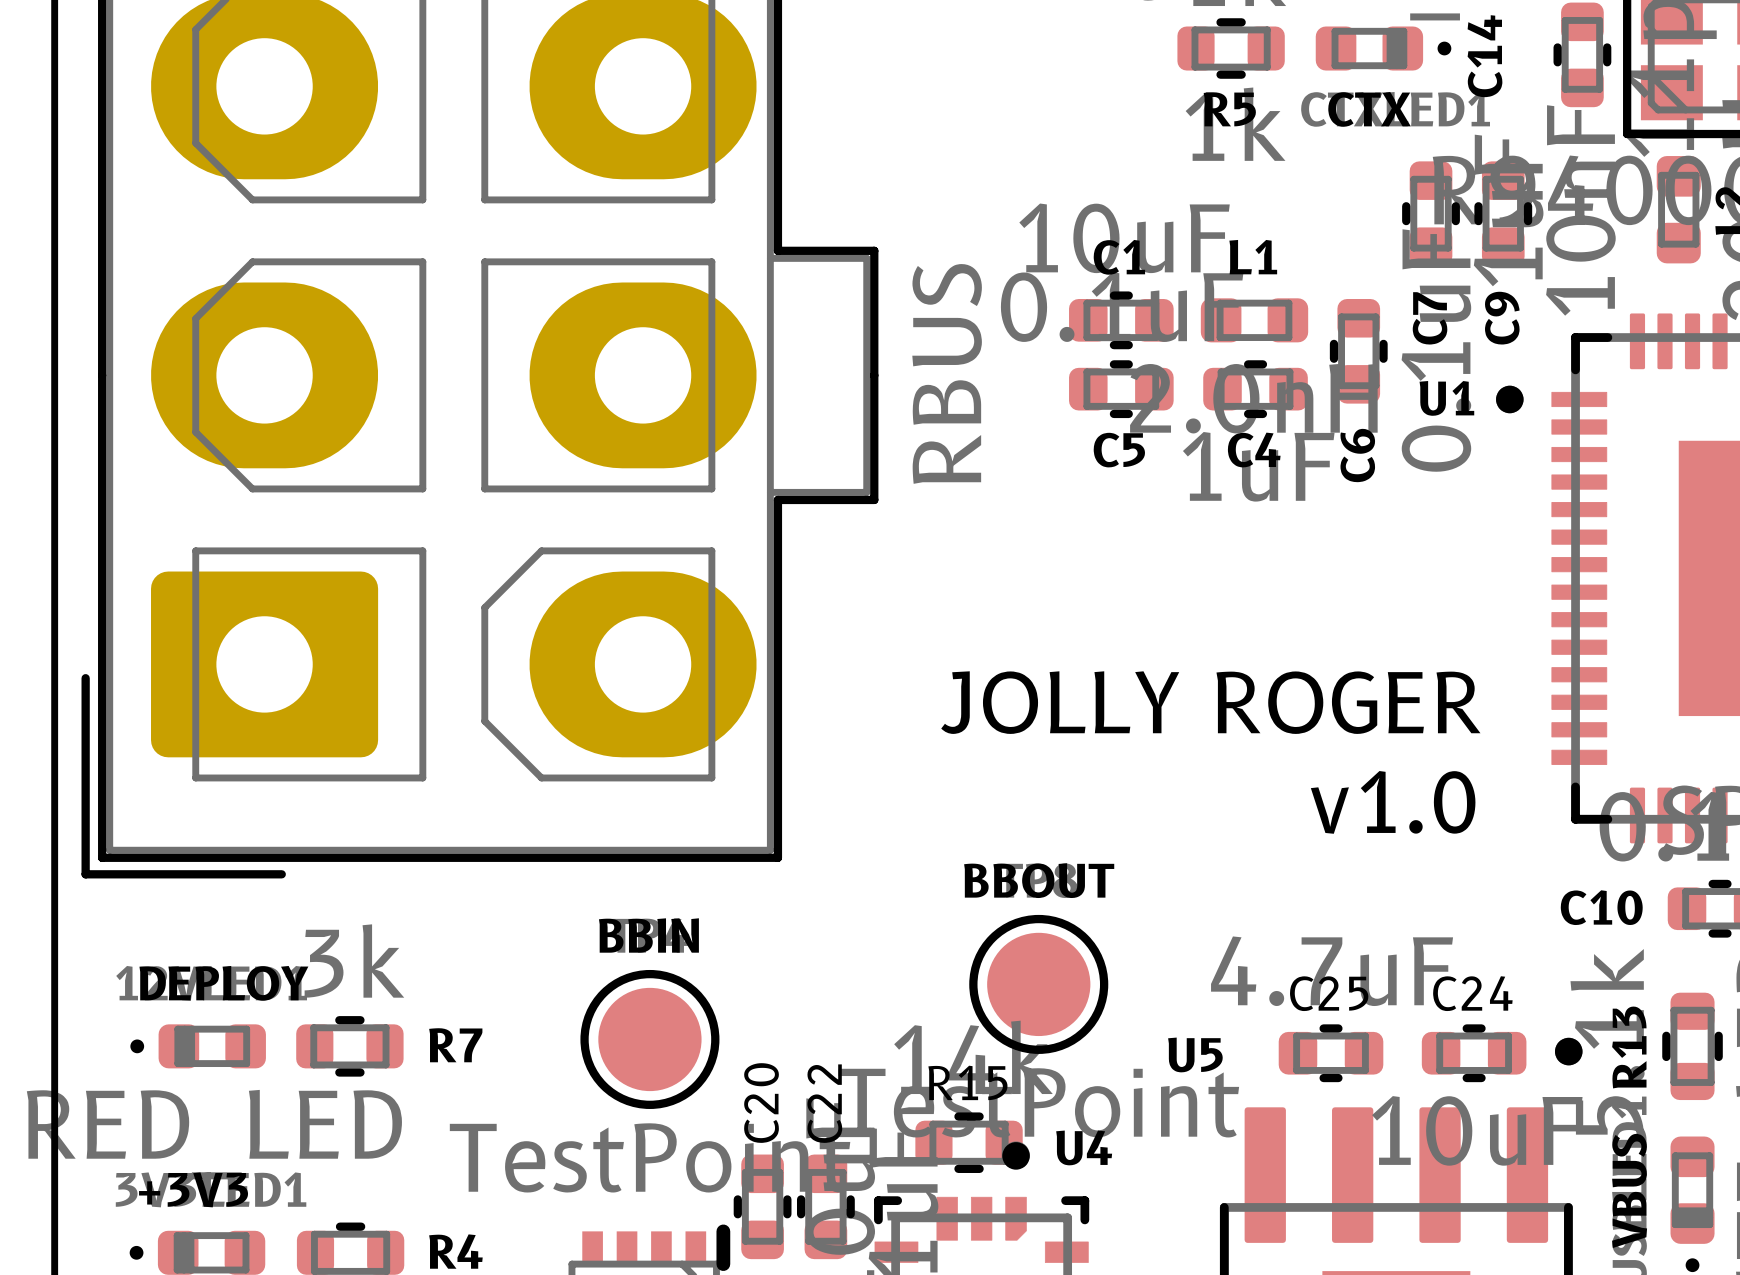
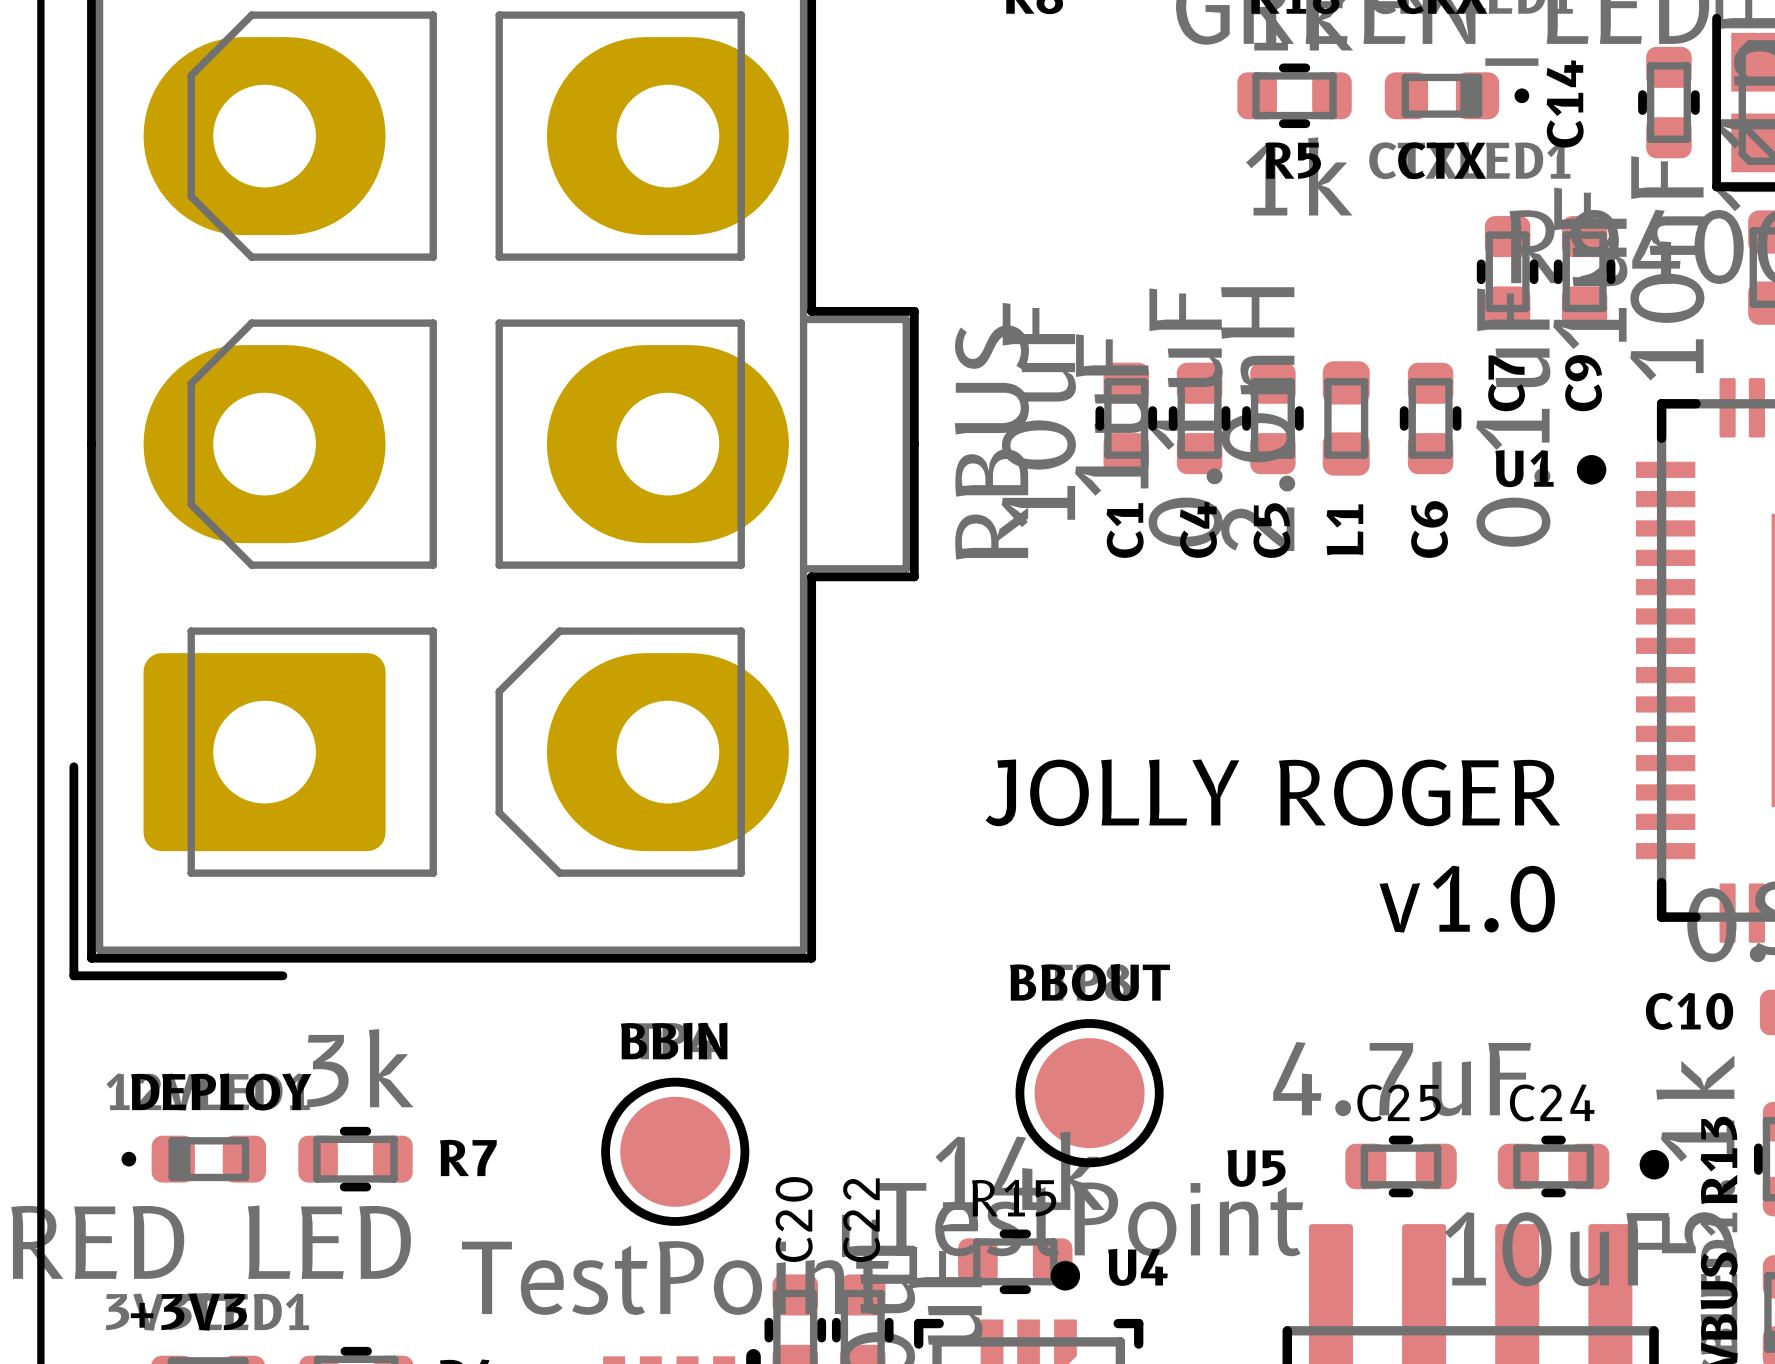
C1 rotation: 0° (1121, 320) -> 90° clockwise (1126, 418)
L1 rotation: 0° (1254, 320) -> 90° clockwise (1346, 418)
C5 rotation: 0° (1121, 389) -> 90° clockwise (1272, 418)
C5 position: (1121, 389) -> (1272, 418)
C4 rotation: 0° (1255, 389) -> 90° clockwise (1199, 418)
C4 position: (1255, 389) -> (1199, 418)

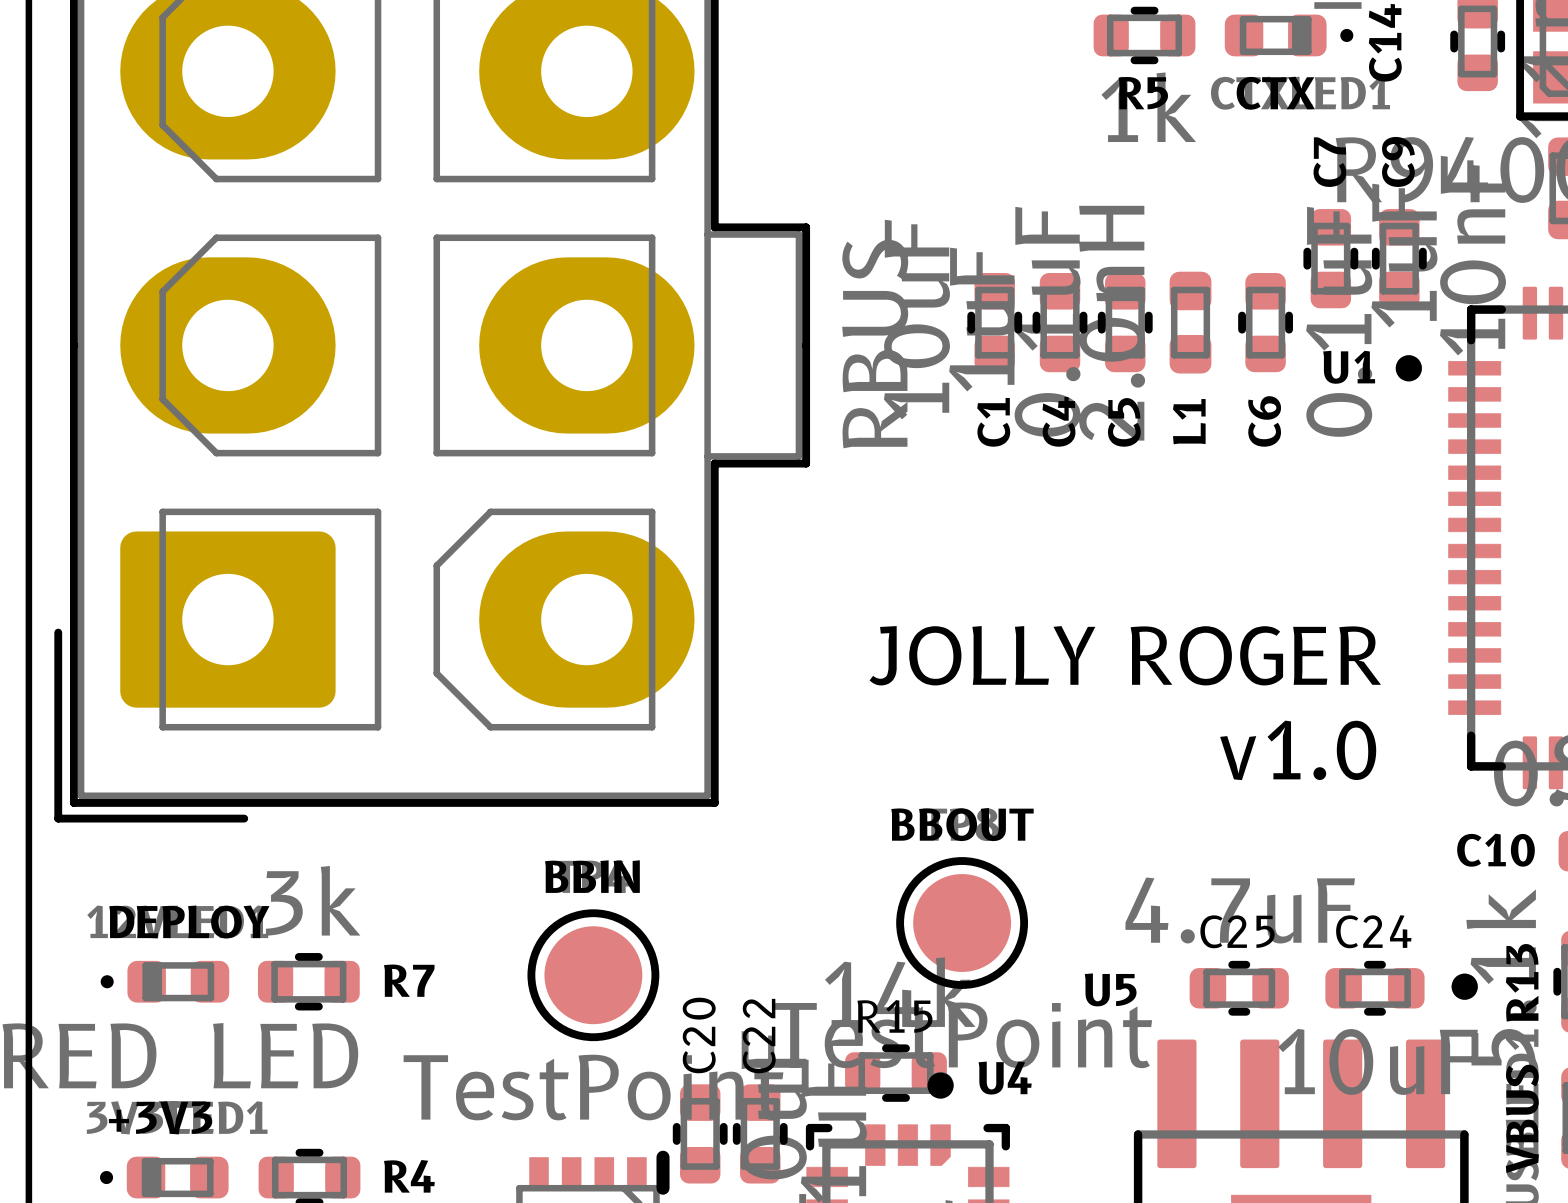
C7 position: (1507, 271) -> (1330, 258)
C9 position: (1584, 271) -> (1399, 258)
C7 name position: C7 (1506, 383) -> C7 (1329, 162)
C9 name position: C9 (1583, 383) -> C9 (1398, 161)

